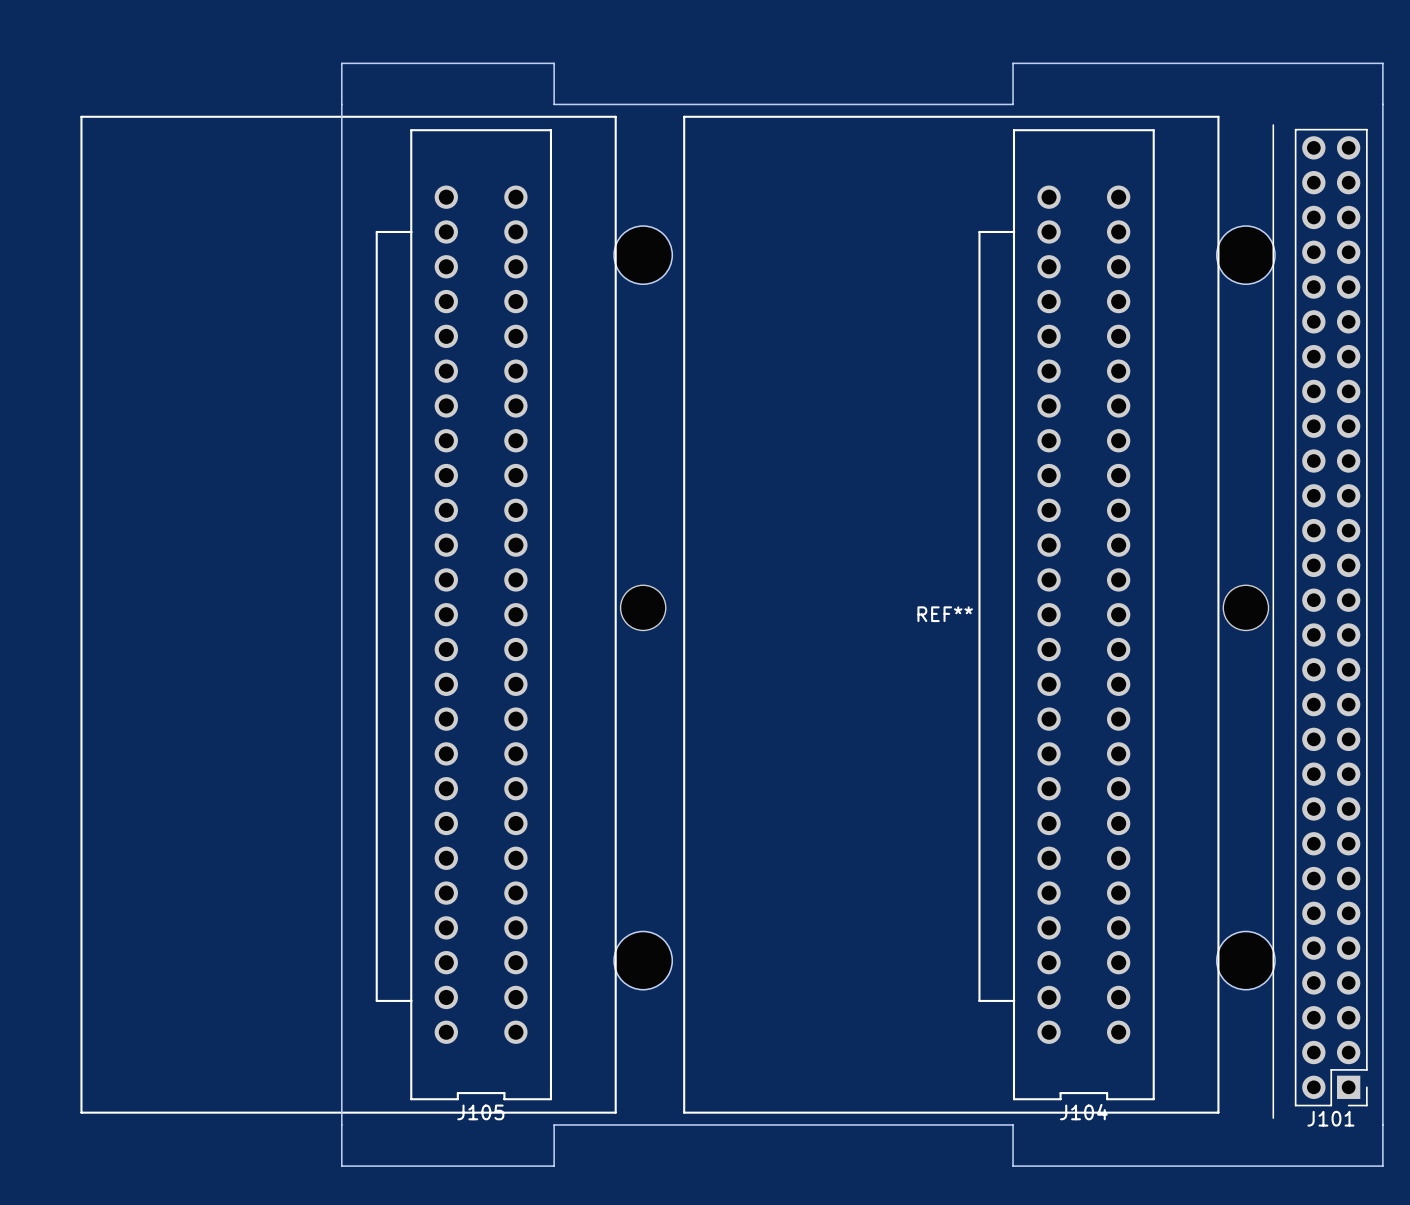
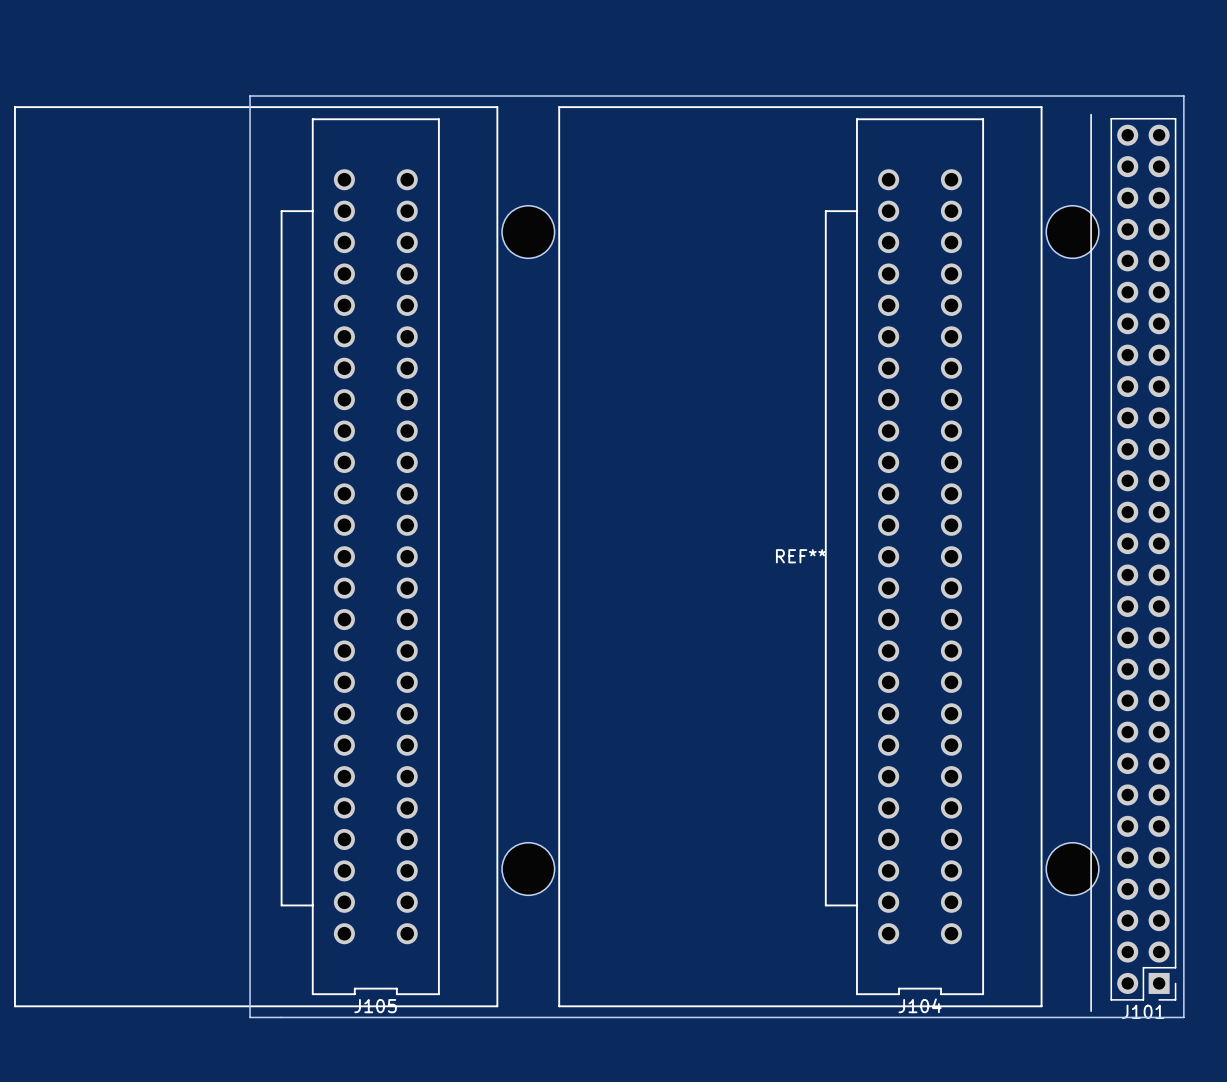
board edge: (341, 104) (341, 63) (554, 63) (554, 104) -> (250, 96) (441, 96)
board edge: (1013, 104) (1013, 63) (1382, 63) (1382, 1166) (1013, 1166) (1013, 1124) -> (856, 96) (1183, 96) (1183, 1017) (856, 1017)
REF** footprint: [614, 226, 1276, 990] -> [502, 205, 1099, 896]
board edge: (341, 1124) (341, 1166) (554, 1166) (554, 1124) -> (250, 1017) (441, 1017)

